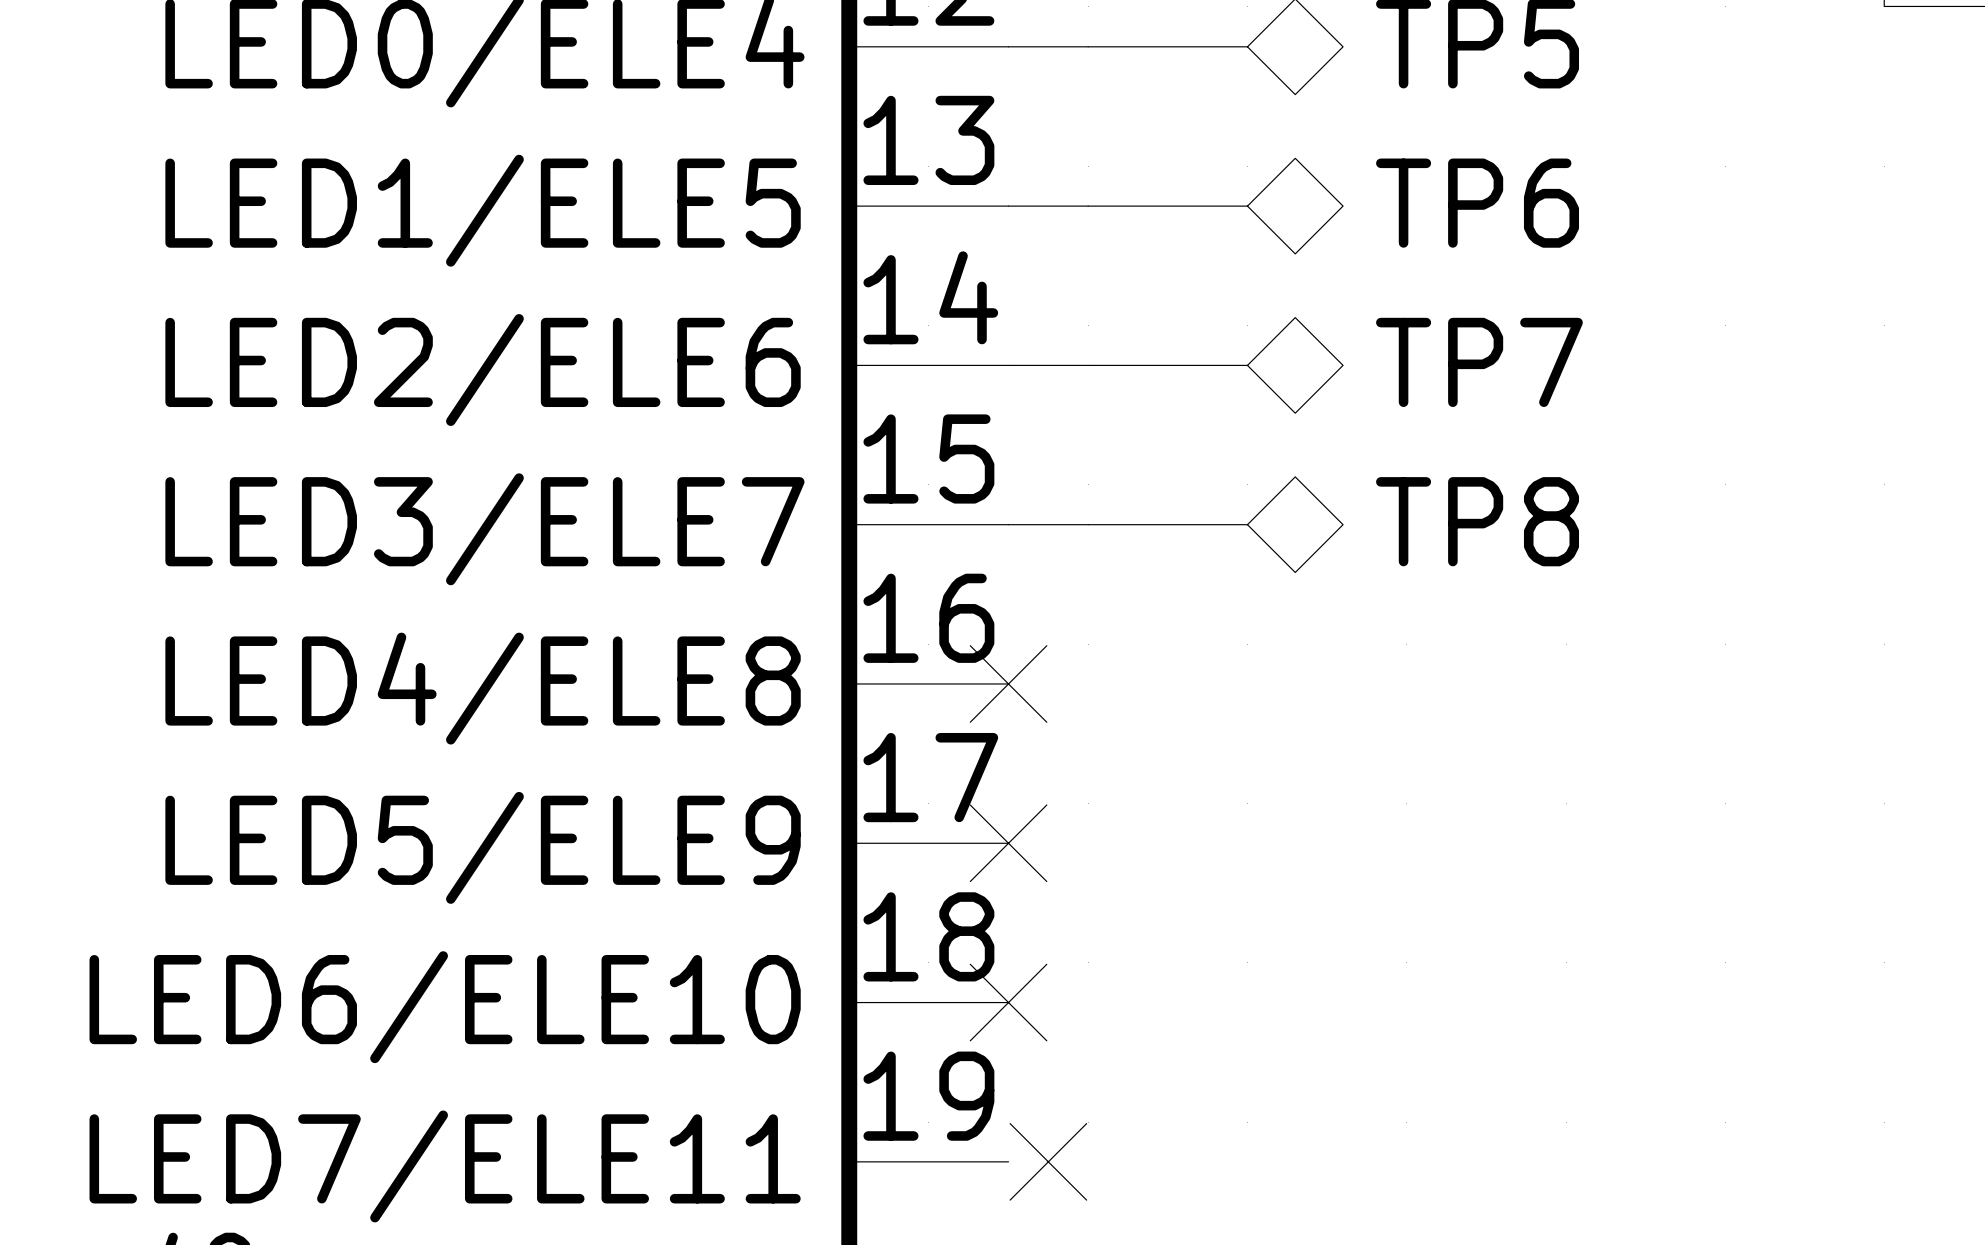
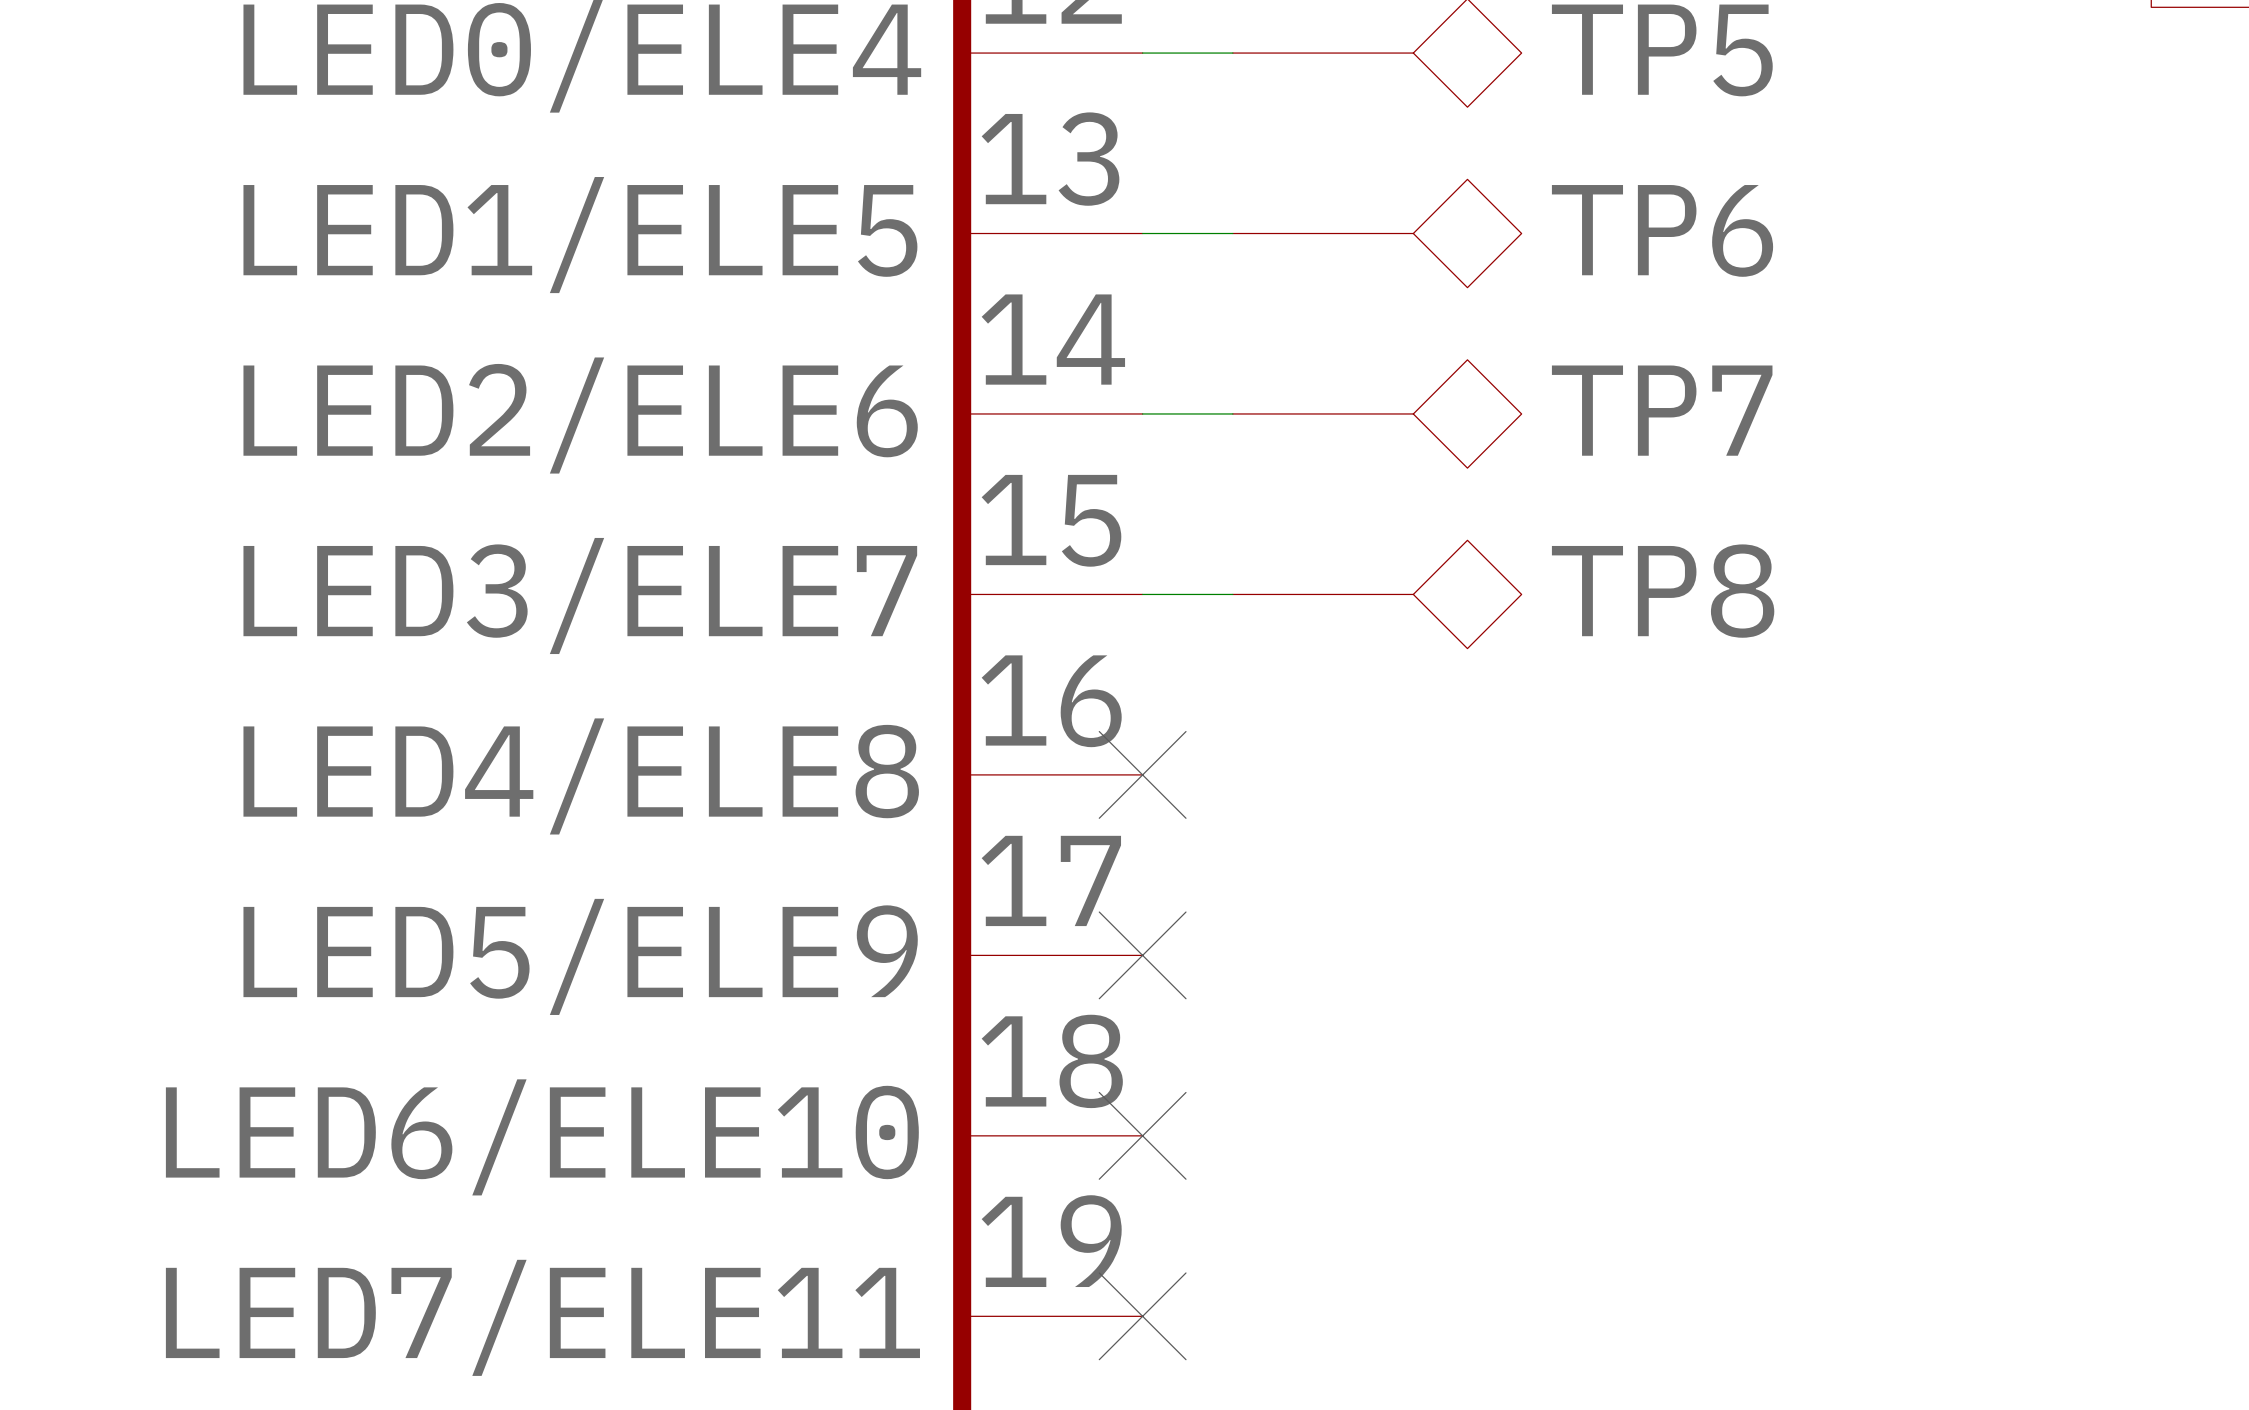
no-connect mark position: (1048, 1161) -> (1142, 1316)

